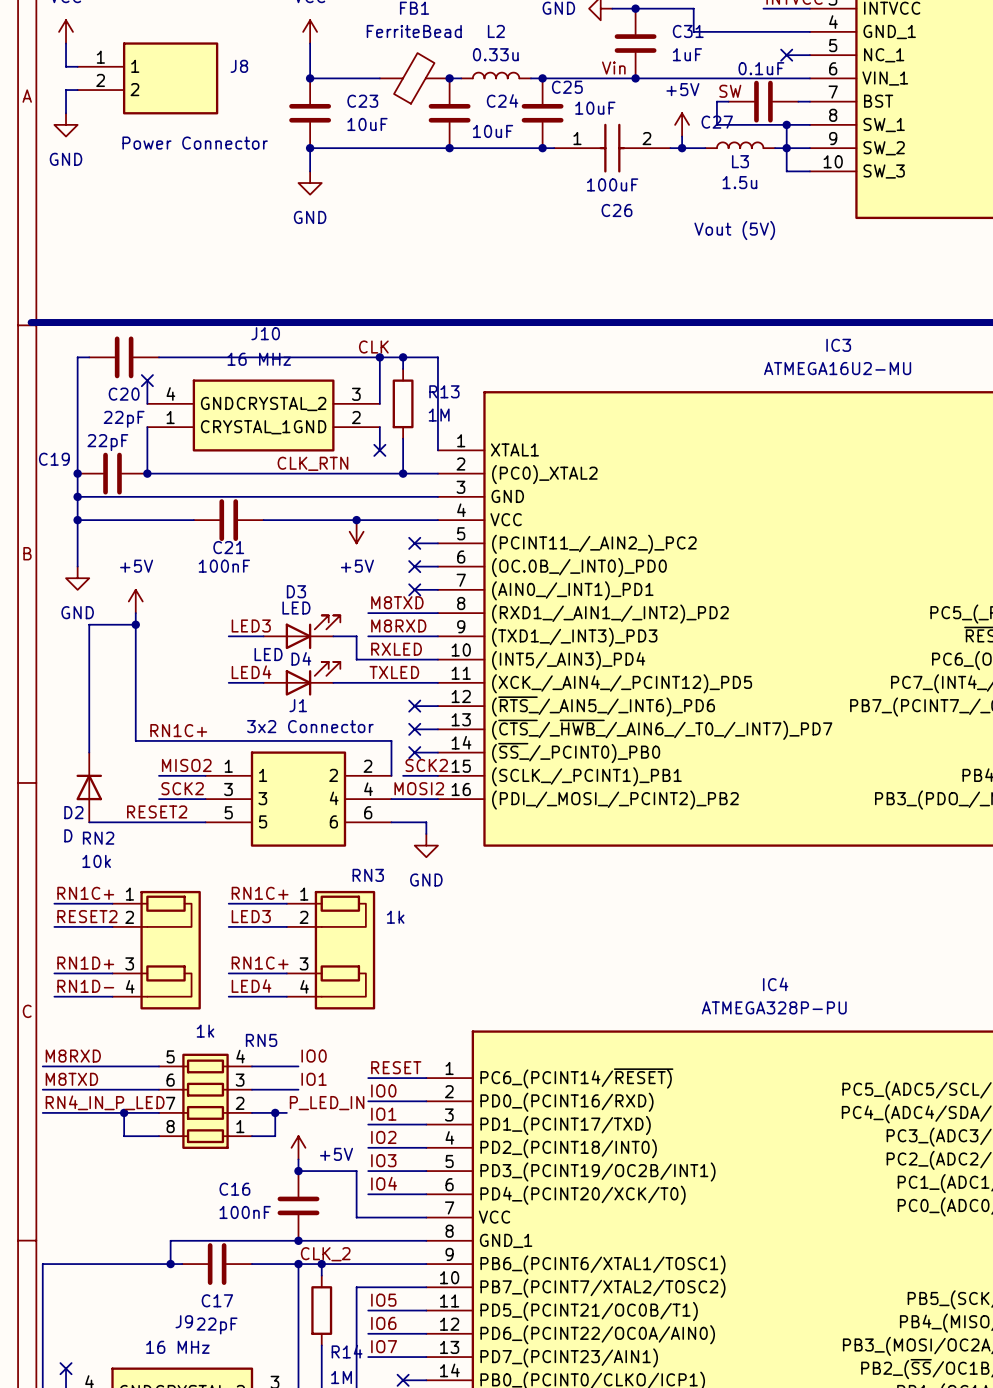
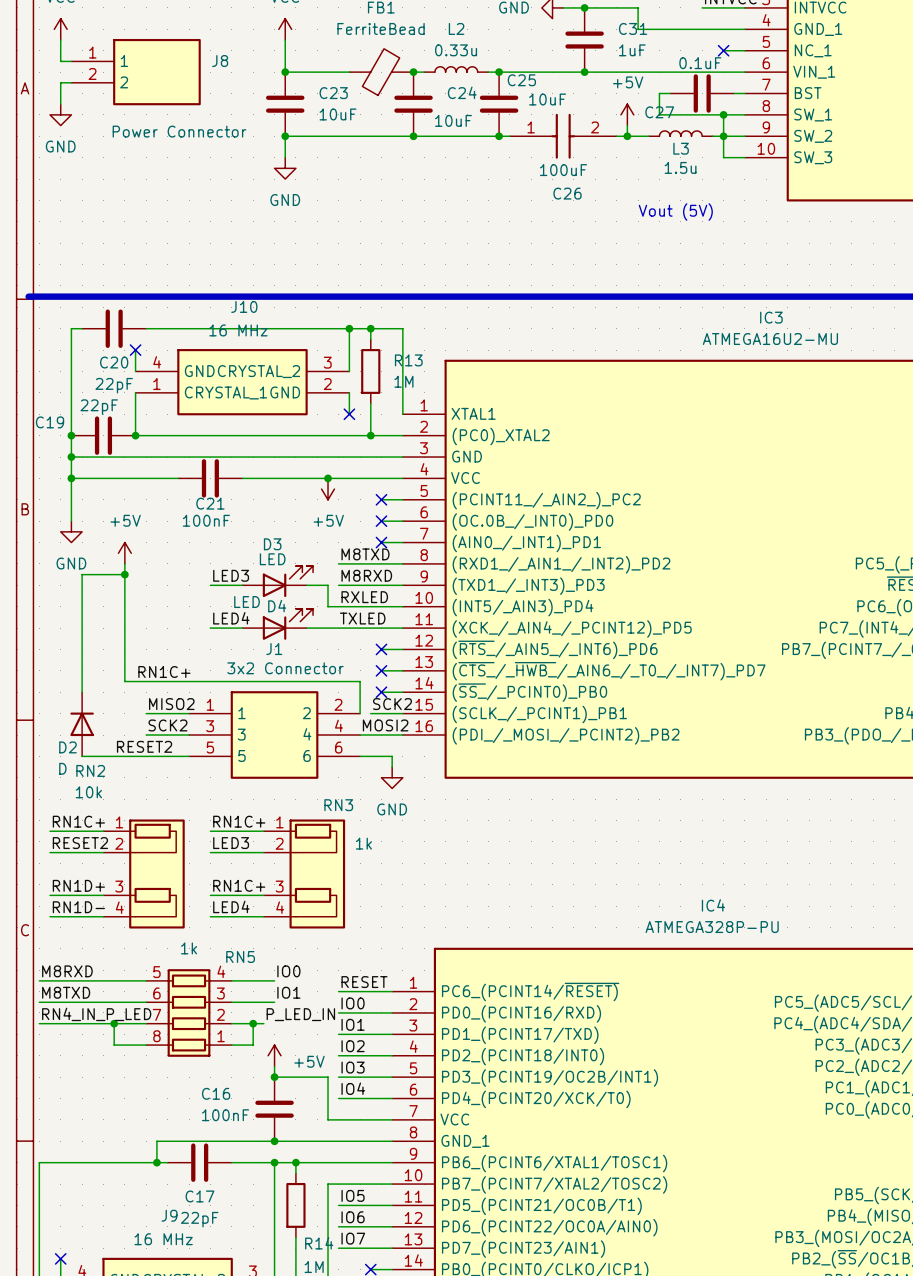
label: Vin (613, 68) -> none
label: SW (730, 91) -> none
label: CLK (373, 347) -> none
label: CLK_RTN (312, 463) -> none
label: CLK_2 (325, 1254) -> none

